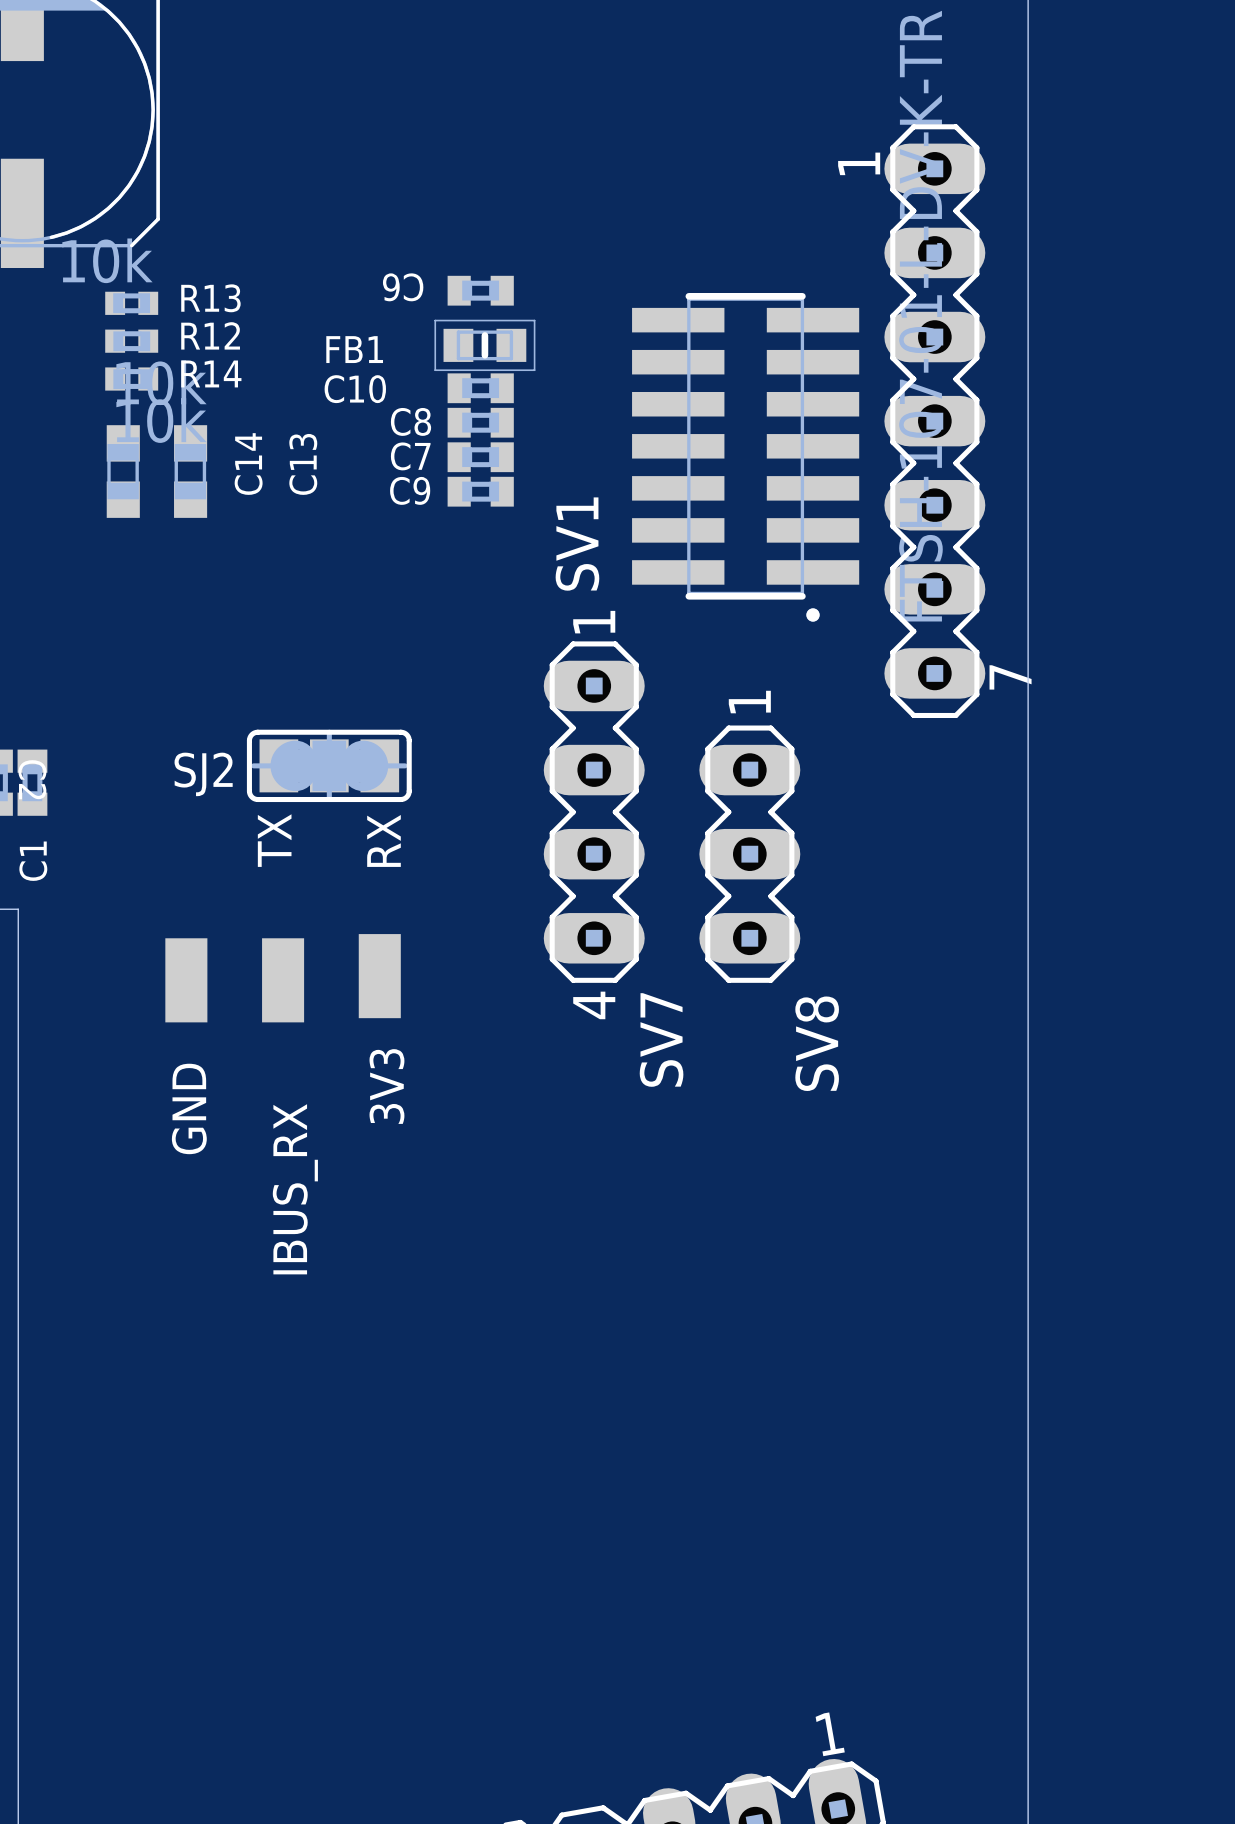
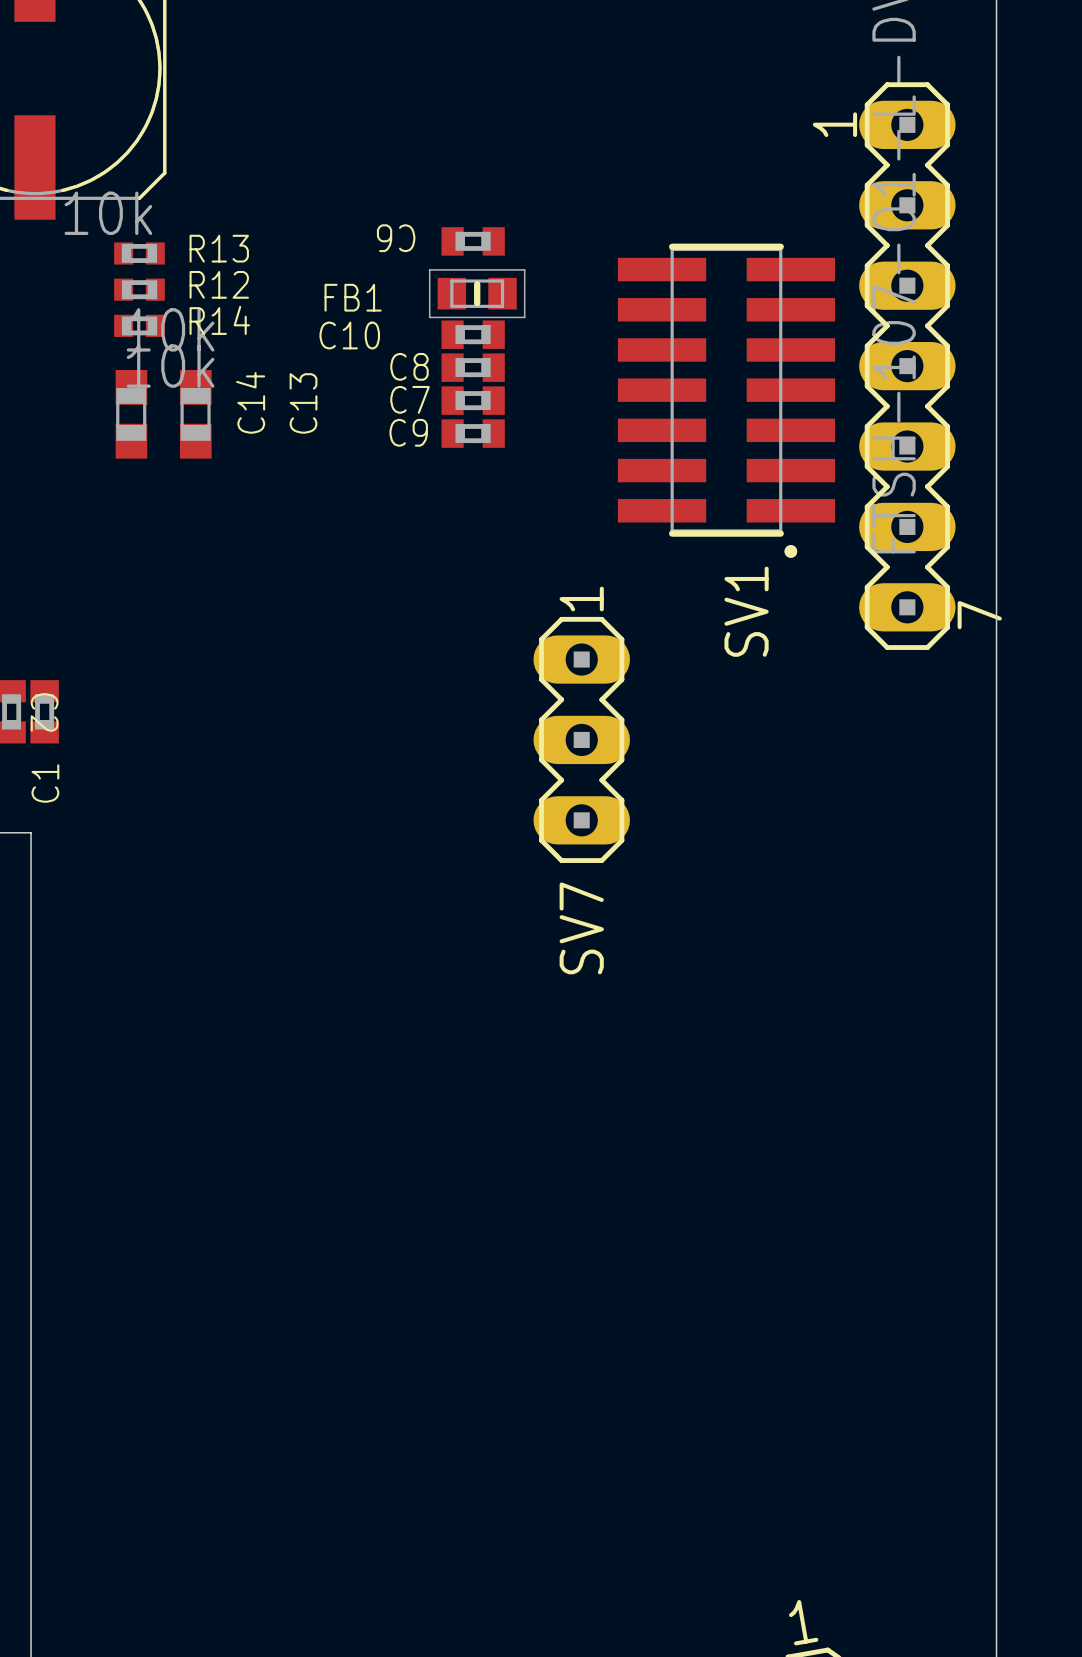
SV1 name position: SV1 (577, 544) -> SV1 (746, 611)
SV7 footprint: [543, 641, 645, 983] -> [533, 616, 630, 863]
SJ2: (329, 765) -> none
text: TX (274, 840) -> none
text: RX (384, 840) -> none
SV8: (749, 854) -> none
3V3: (379, 976) -> none
GND: (186, 980) -> none
IBUS_RX: (283, 980) -> none
SV7 name position: SV7 (661, 1039) -> SV7 (581, 928)

